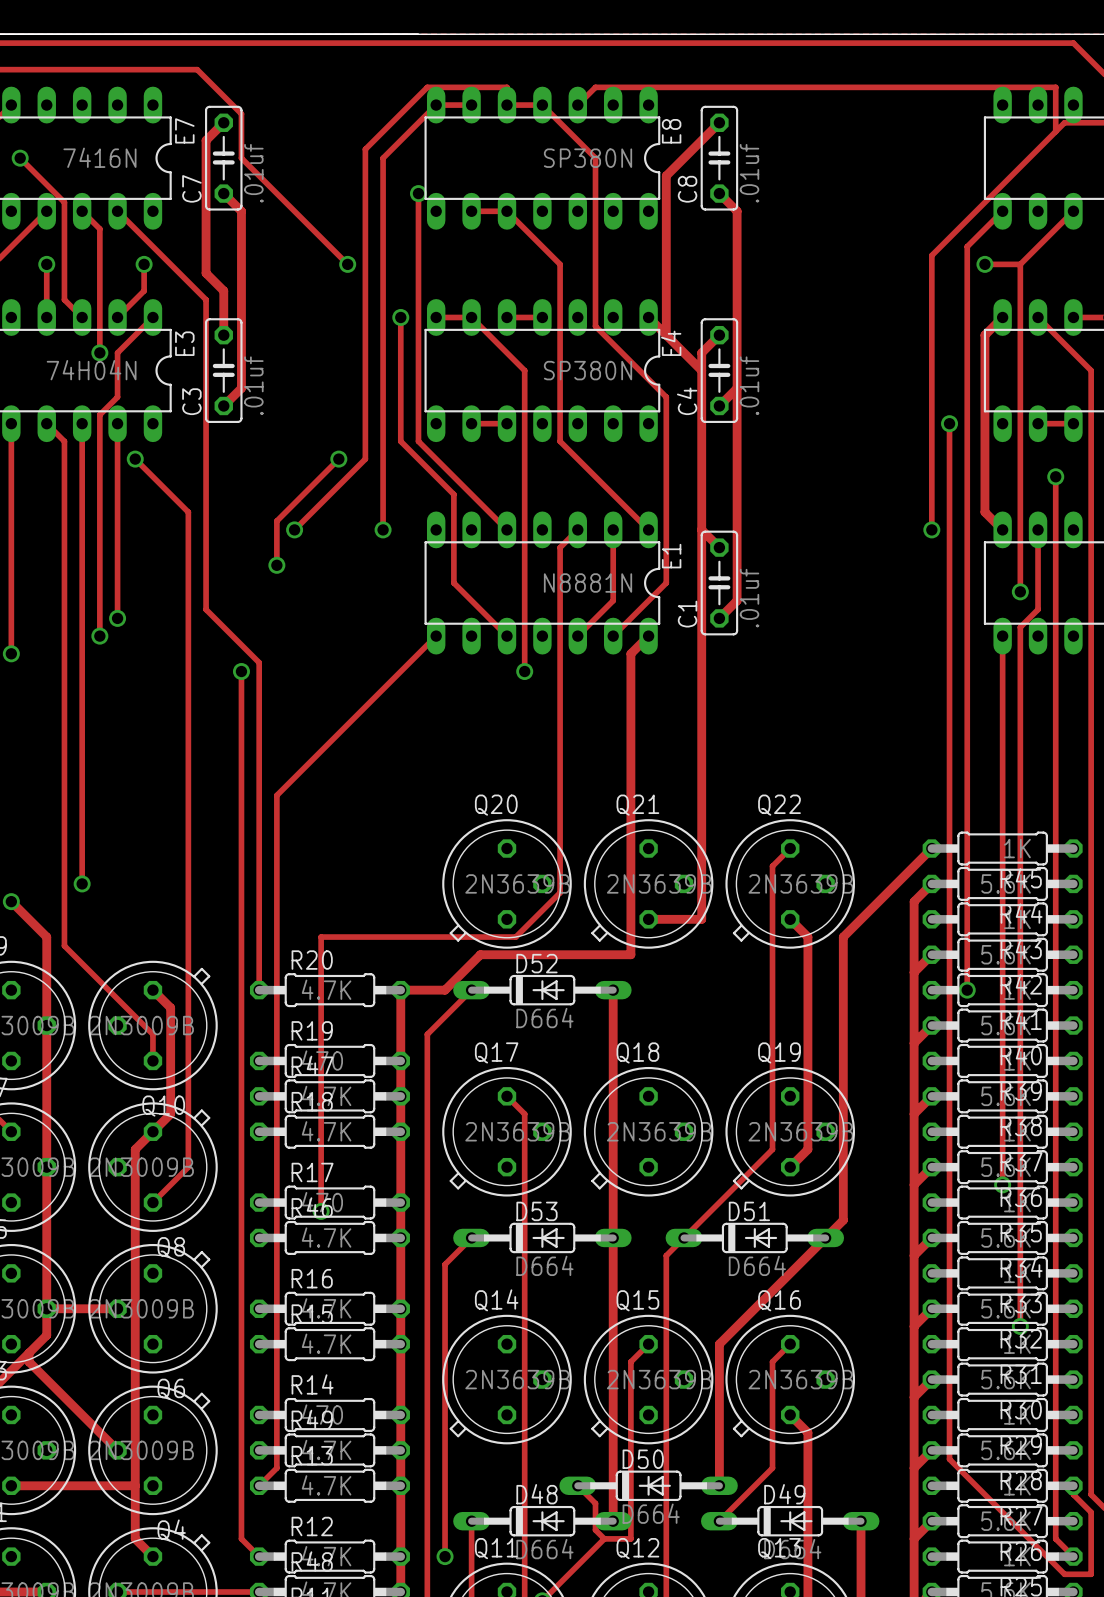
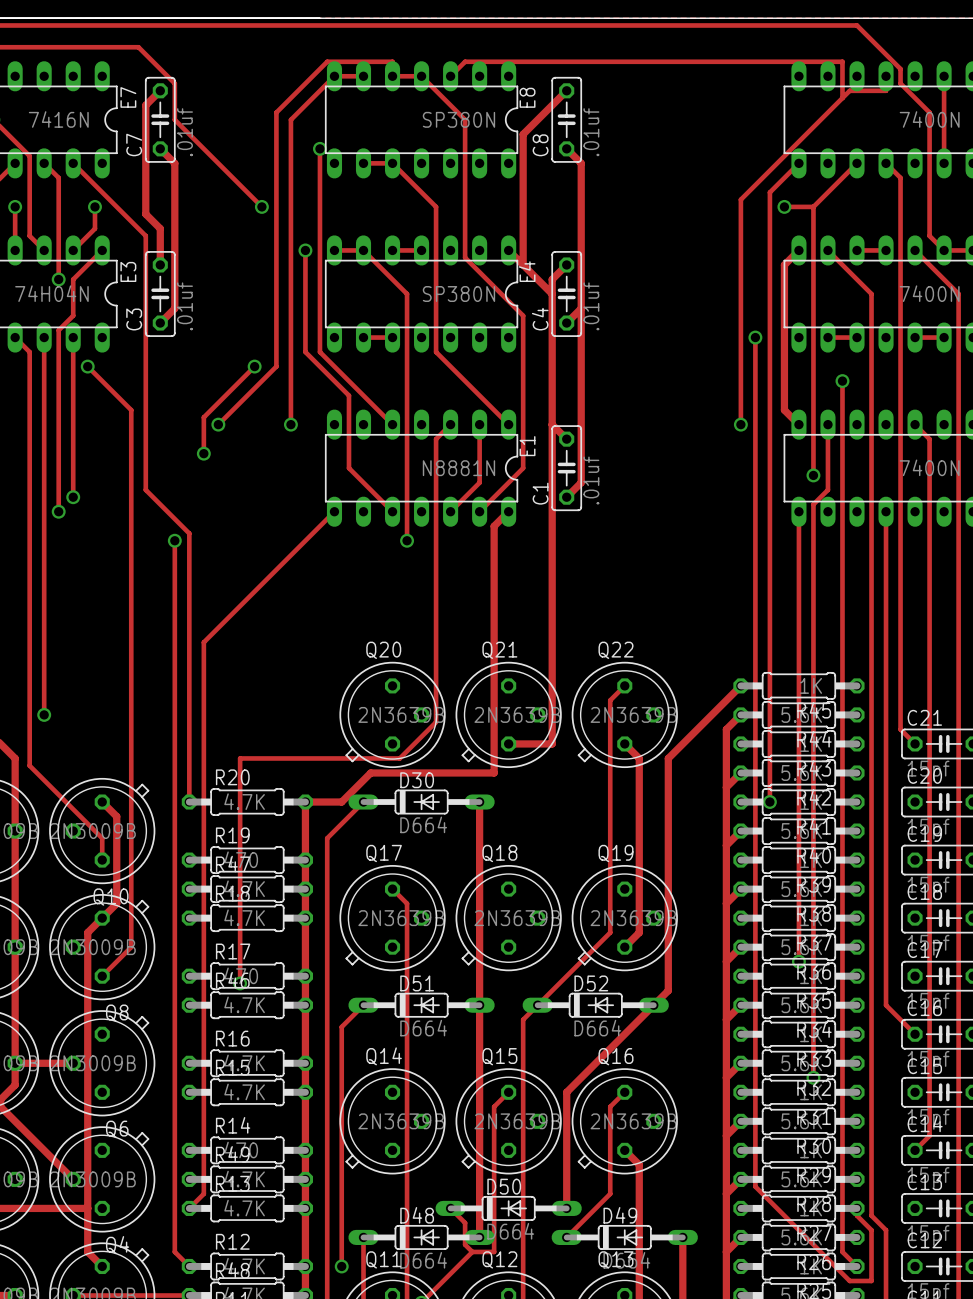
D52 name: D52 (536, 963) -> D30 (417, 780)
D53 name: D53 (536, 1211) -> D51 (417, 983)
D51 name: D51 (749, 1211) -> D52 (591, 983)

